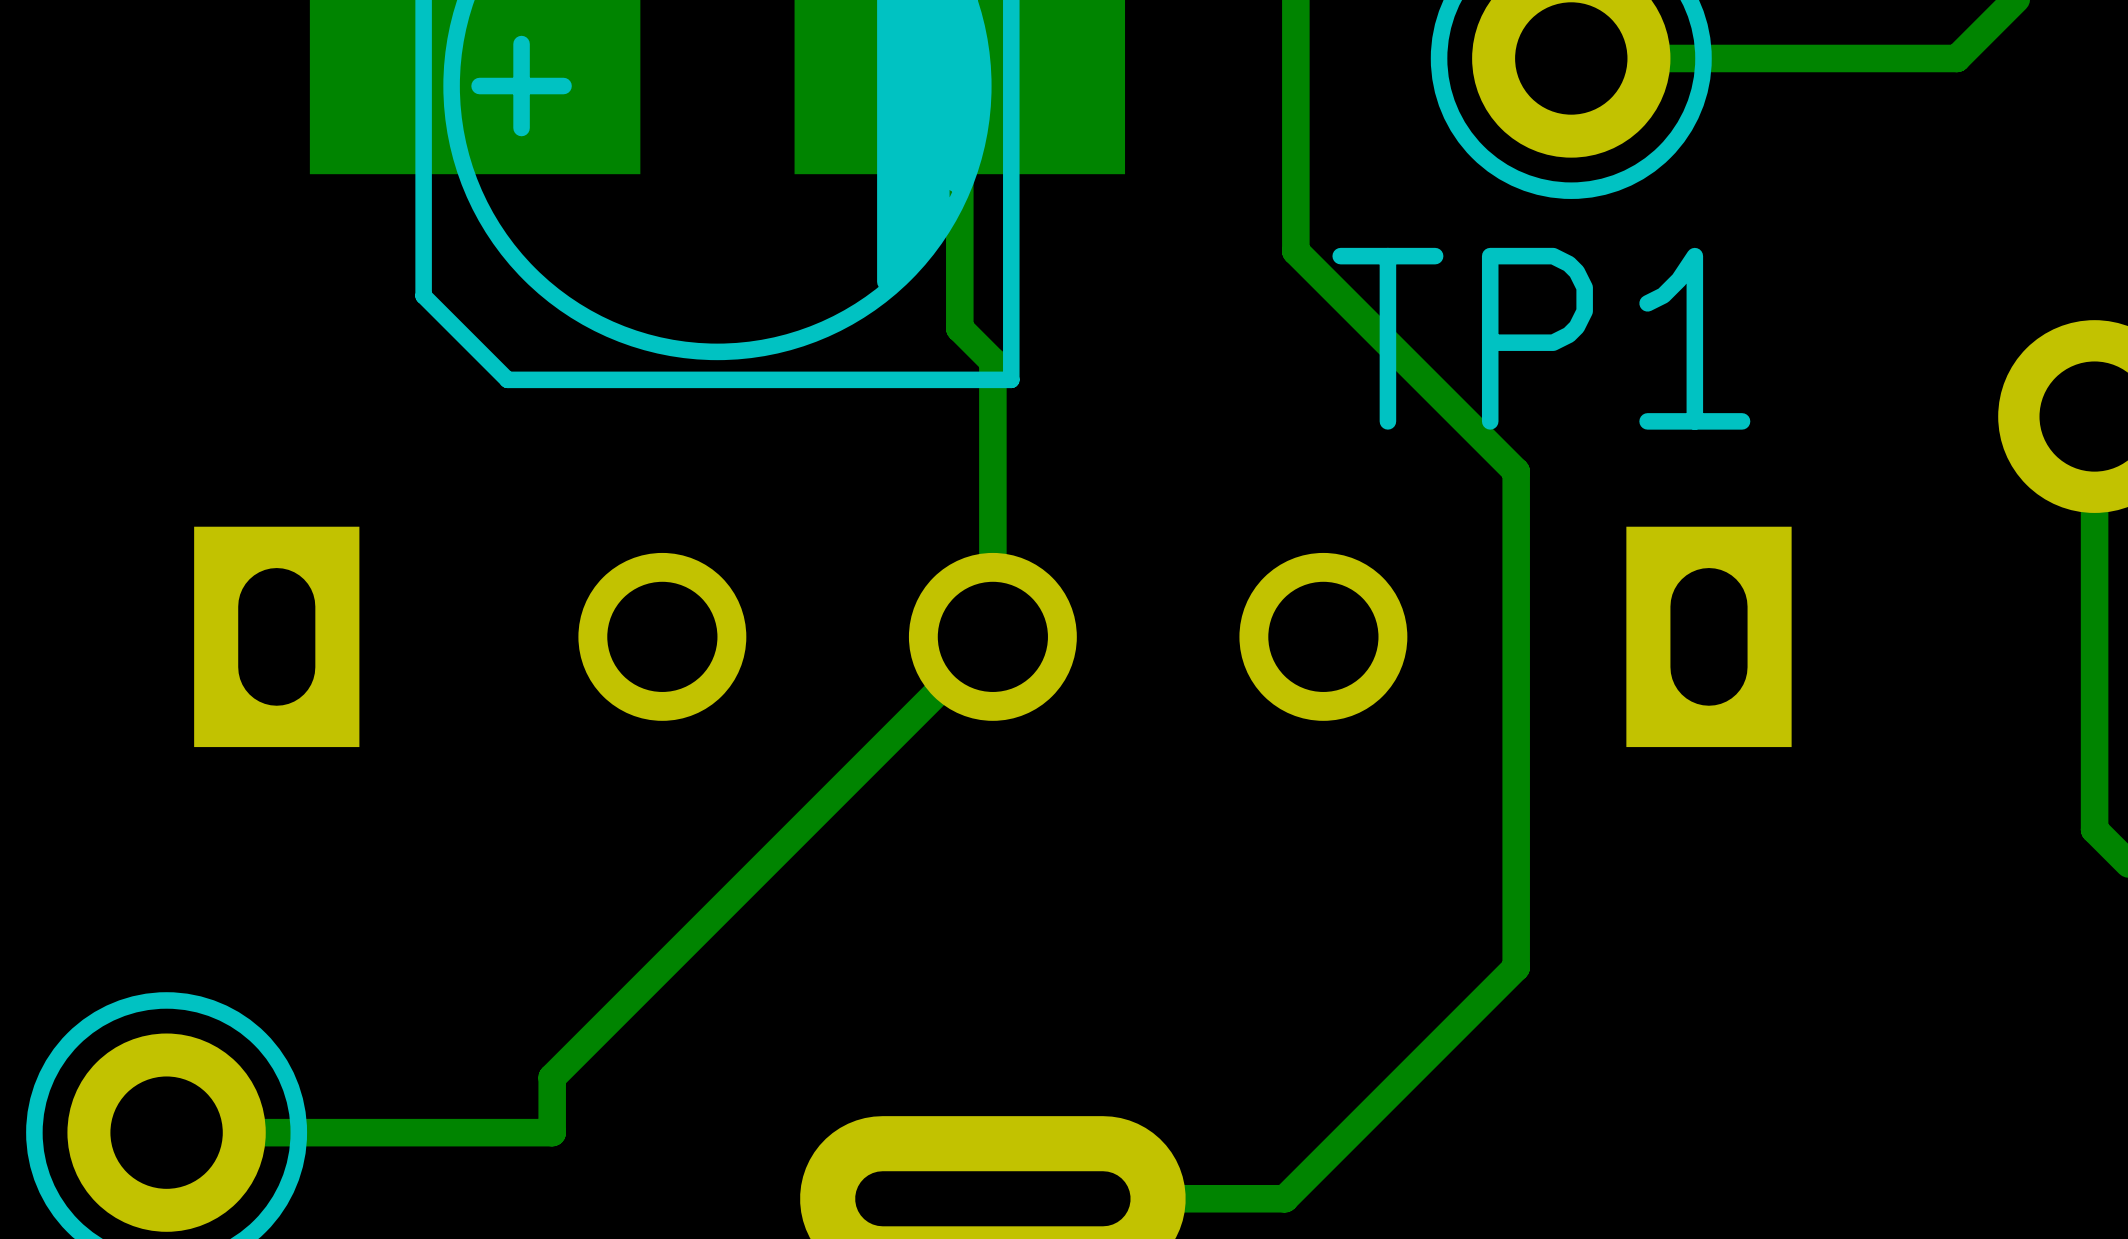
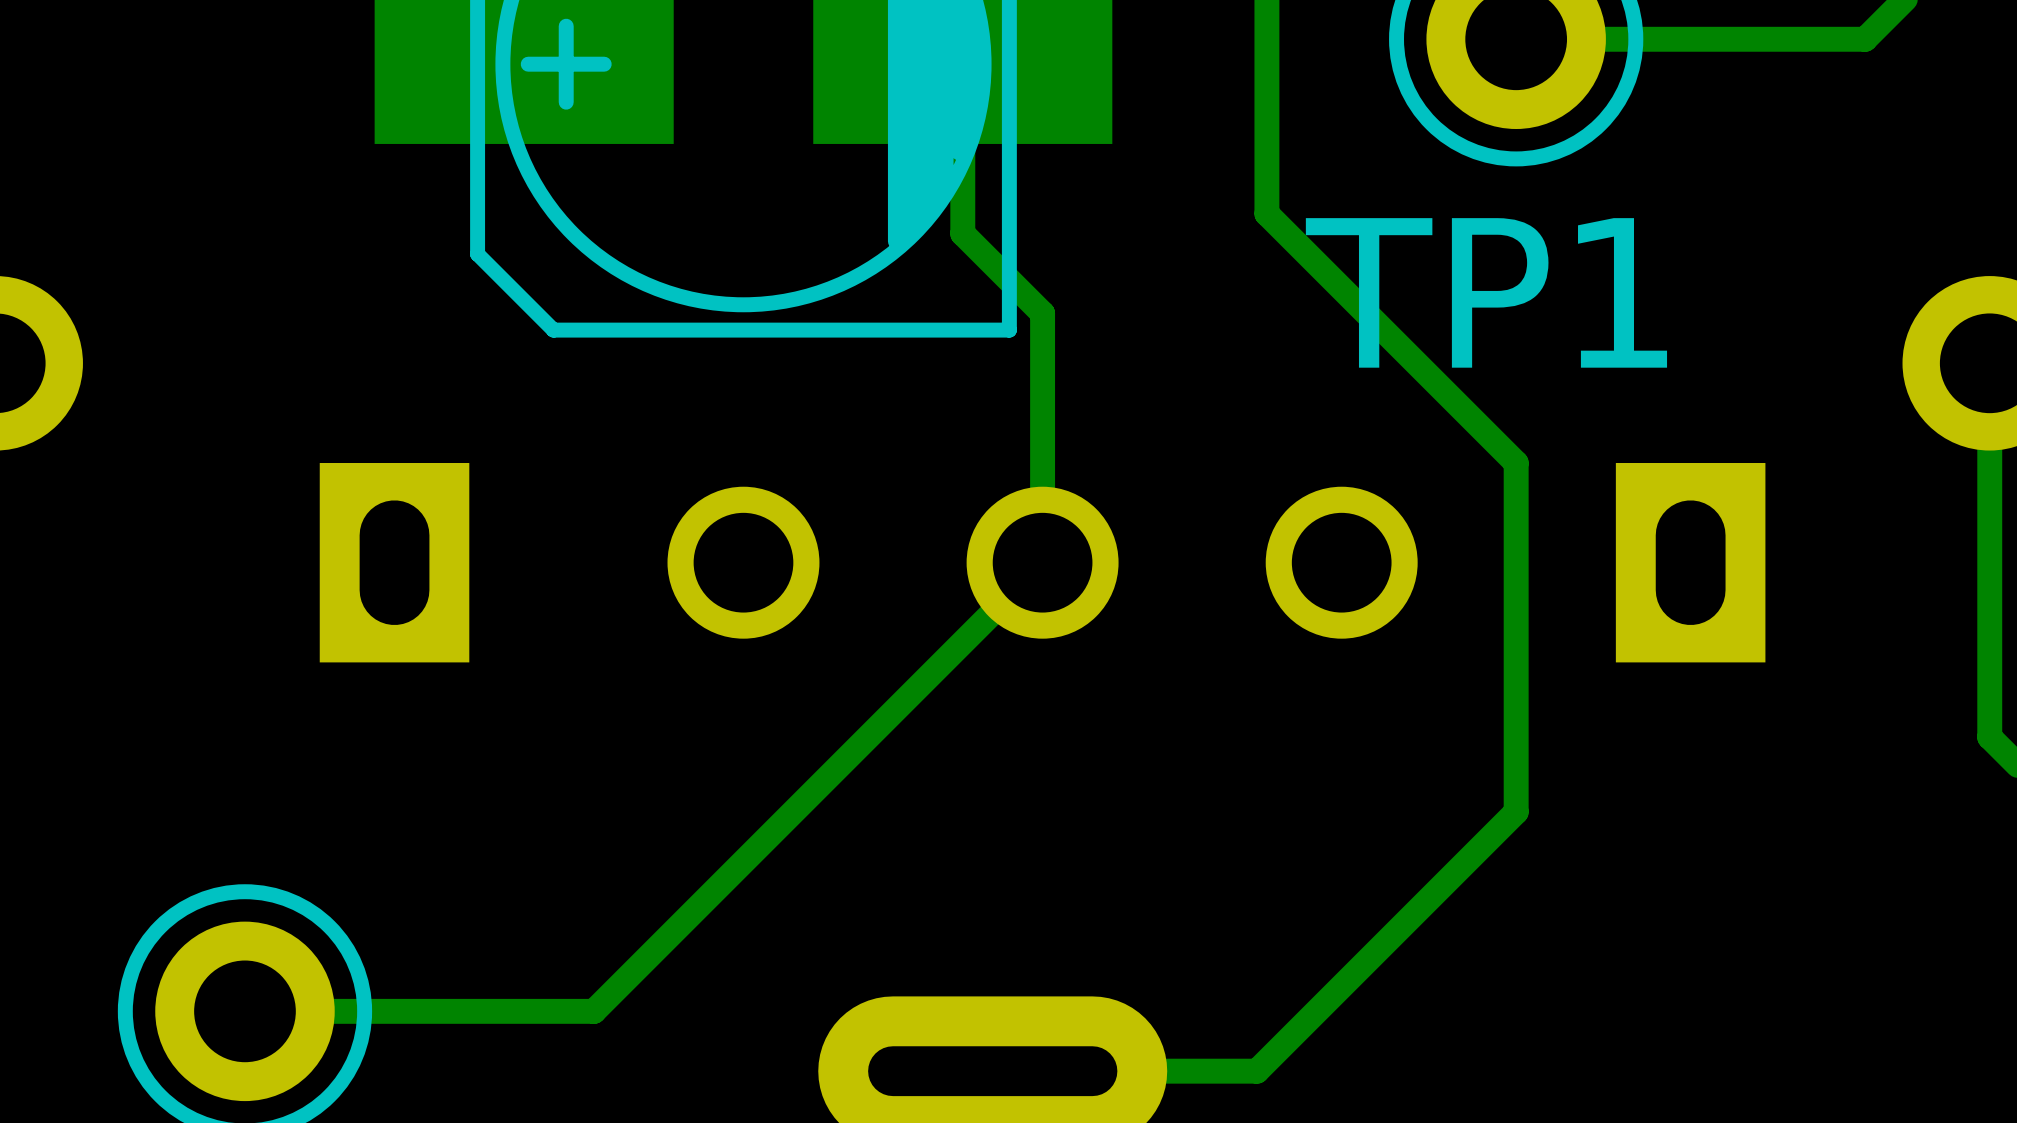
track: (959, 273) (959, 328) (992, 361) (992, 636) (552, 1077) (552, 1132) -> (962, 233) (1042, 313) (1042, 562) (593, 1011)
track: (1516, 471) (1516, 967) -> (1466, 413) (1516, 463) (1516, 811) (1466, 861)
part position: (992, 636) -> (1042, 562)

